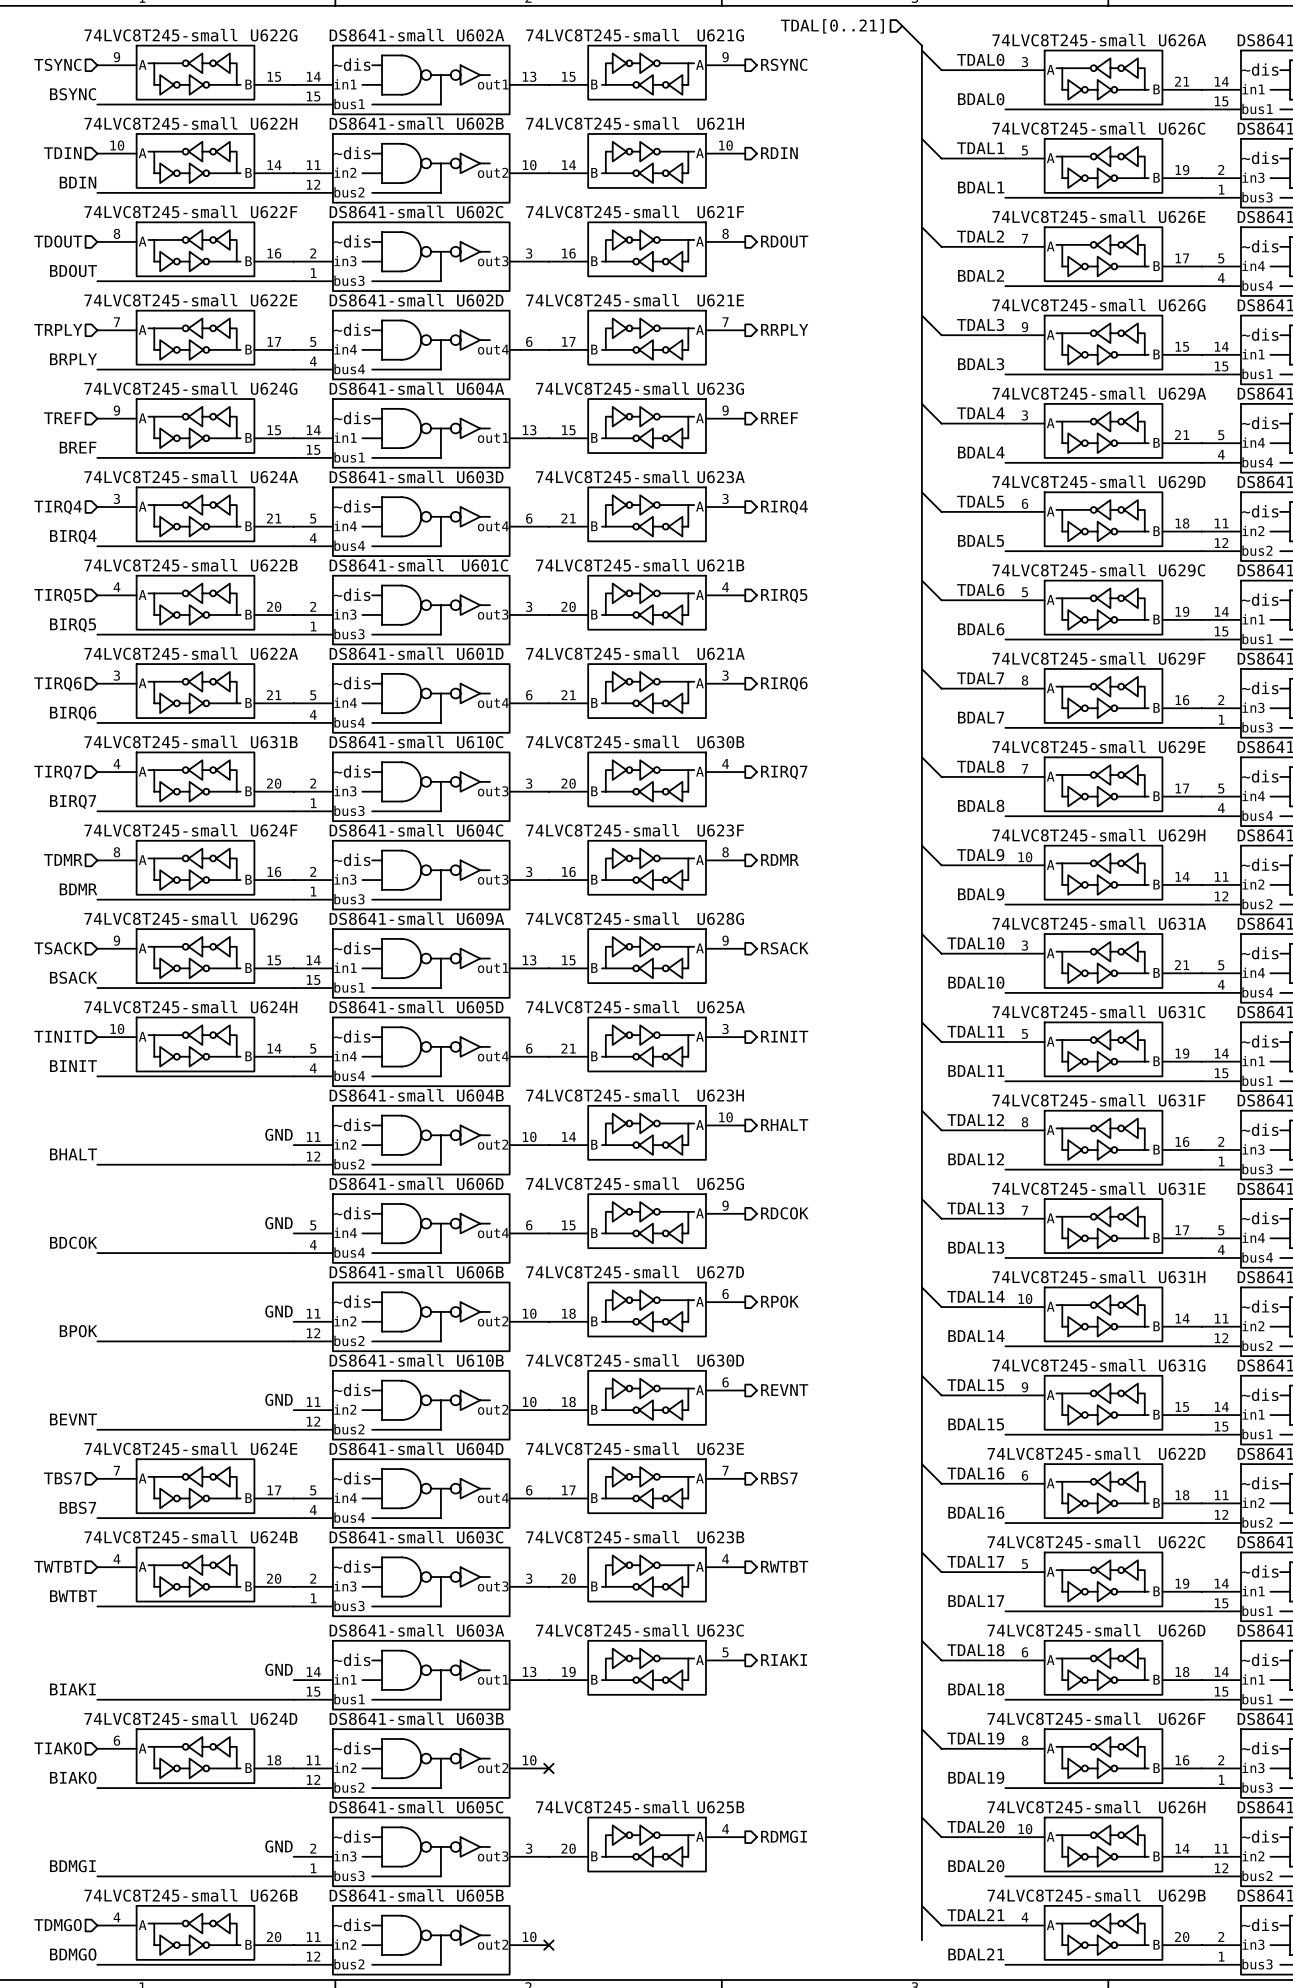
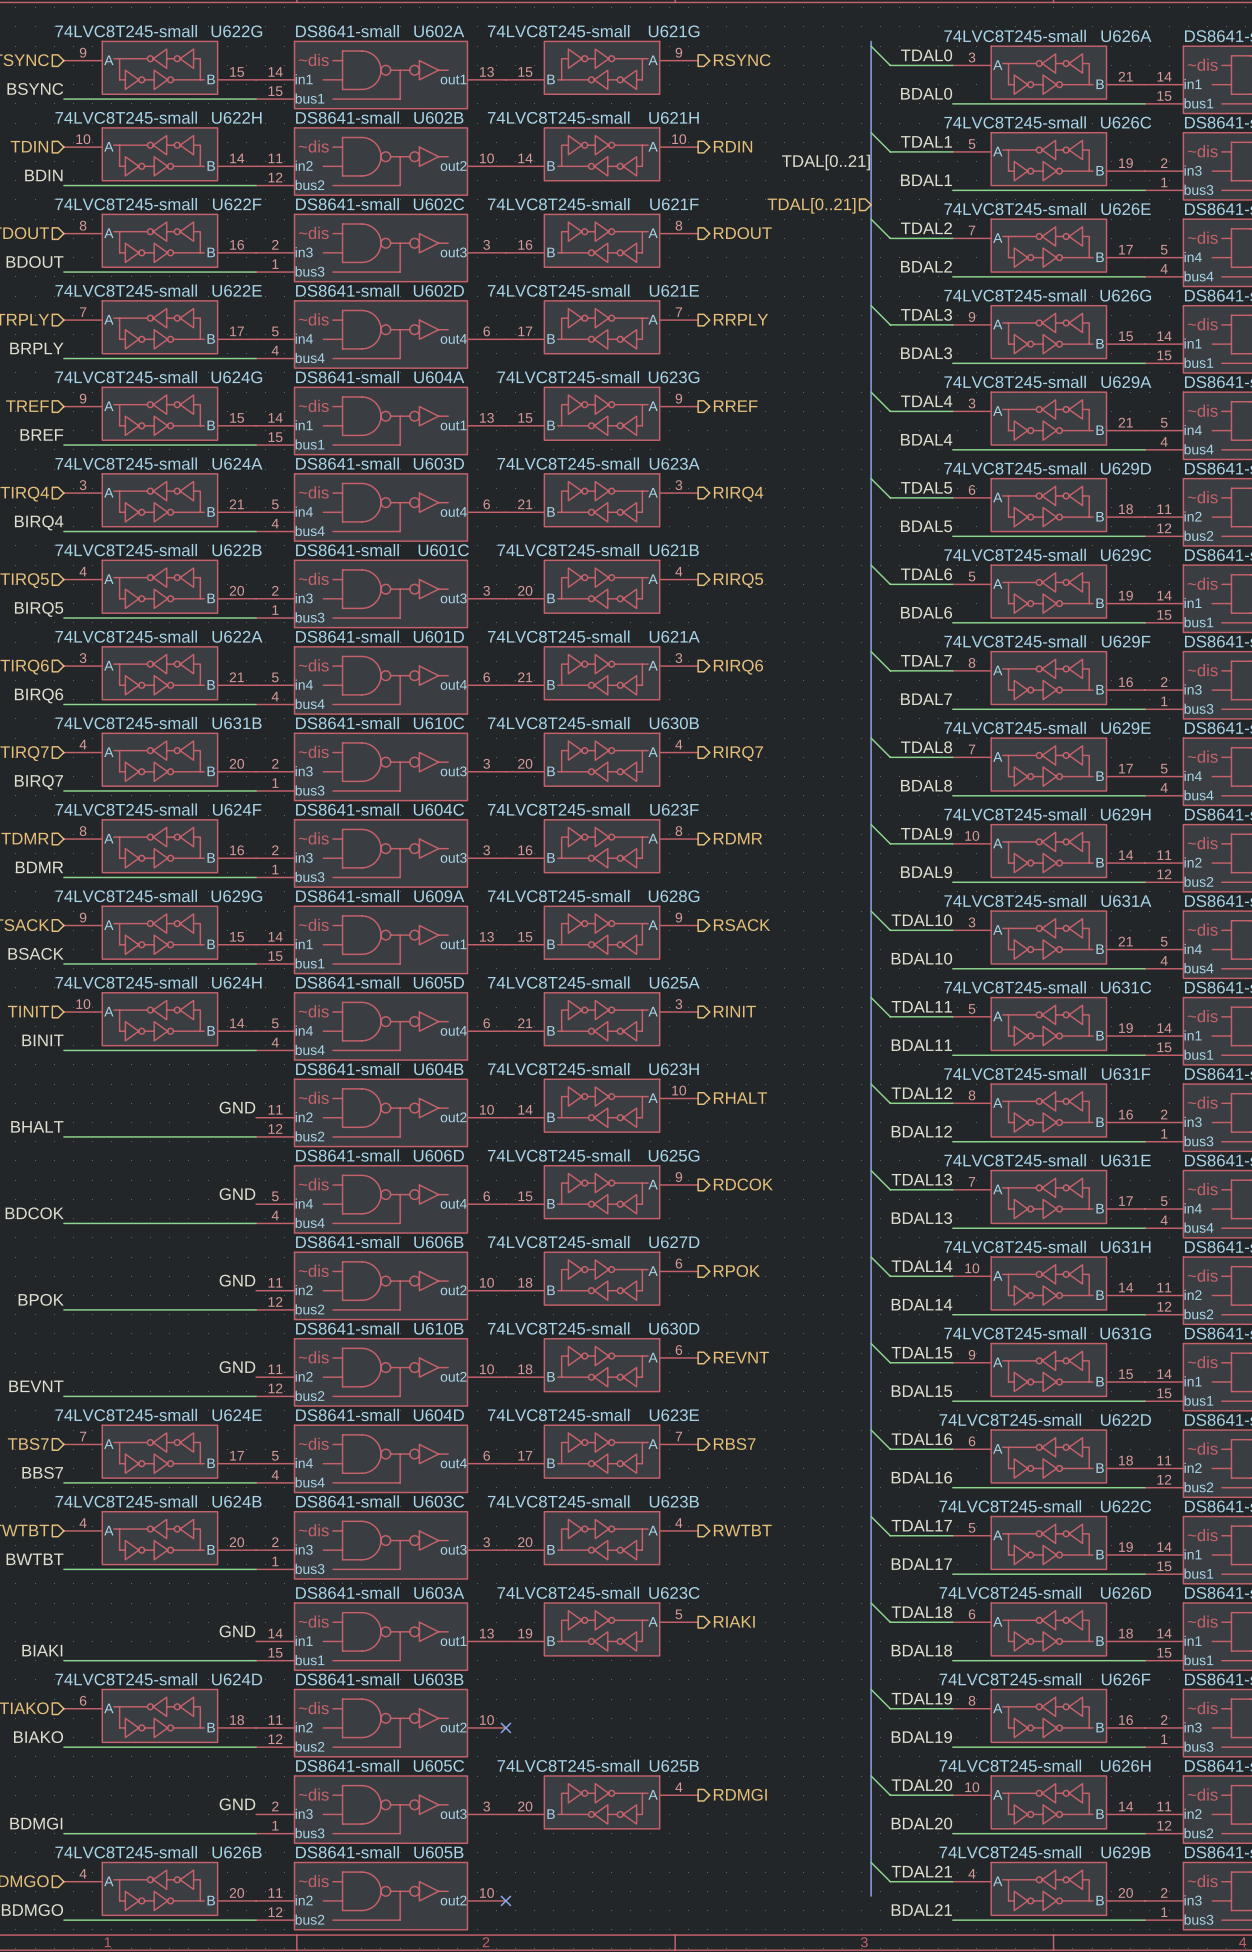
bus: (902, 25) (921, 45) -> none
hierarchical label position: TDAL[0..21] (832, 26) -> TDAL[0..21] (811, 205)
label: none -> TDAL[0..21] (825, 162)

